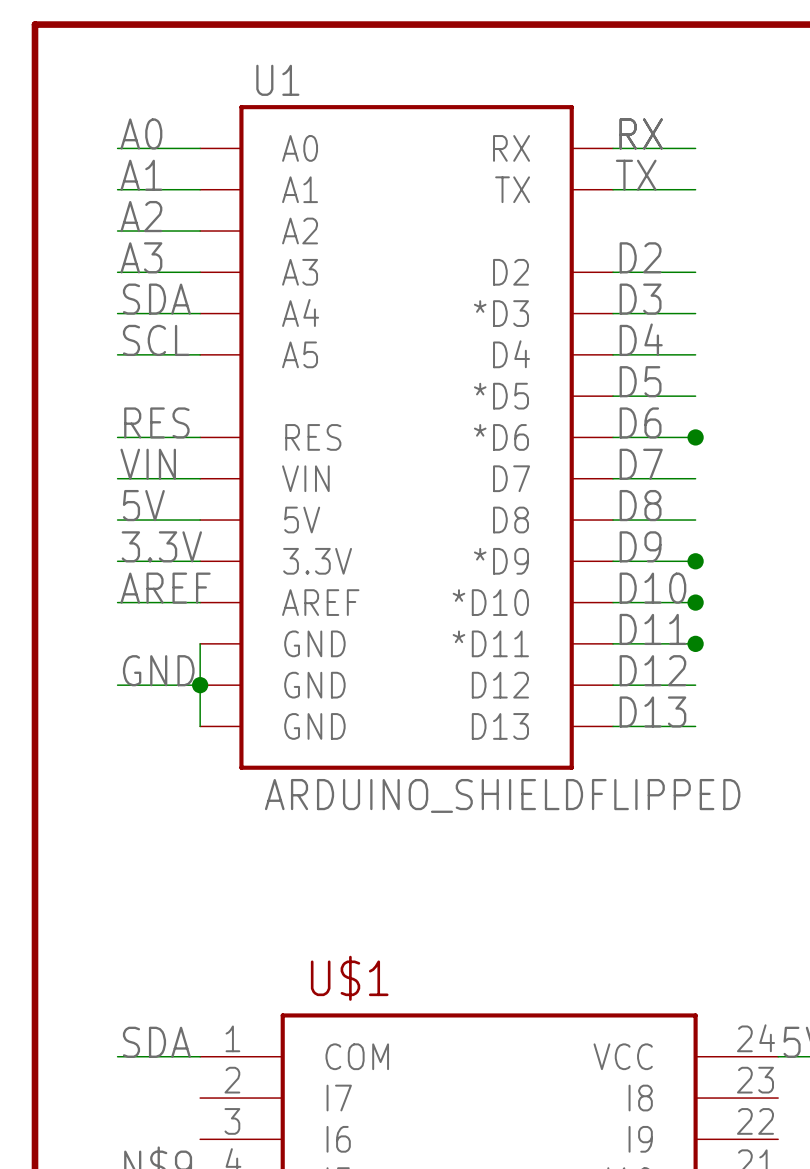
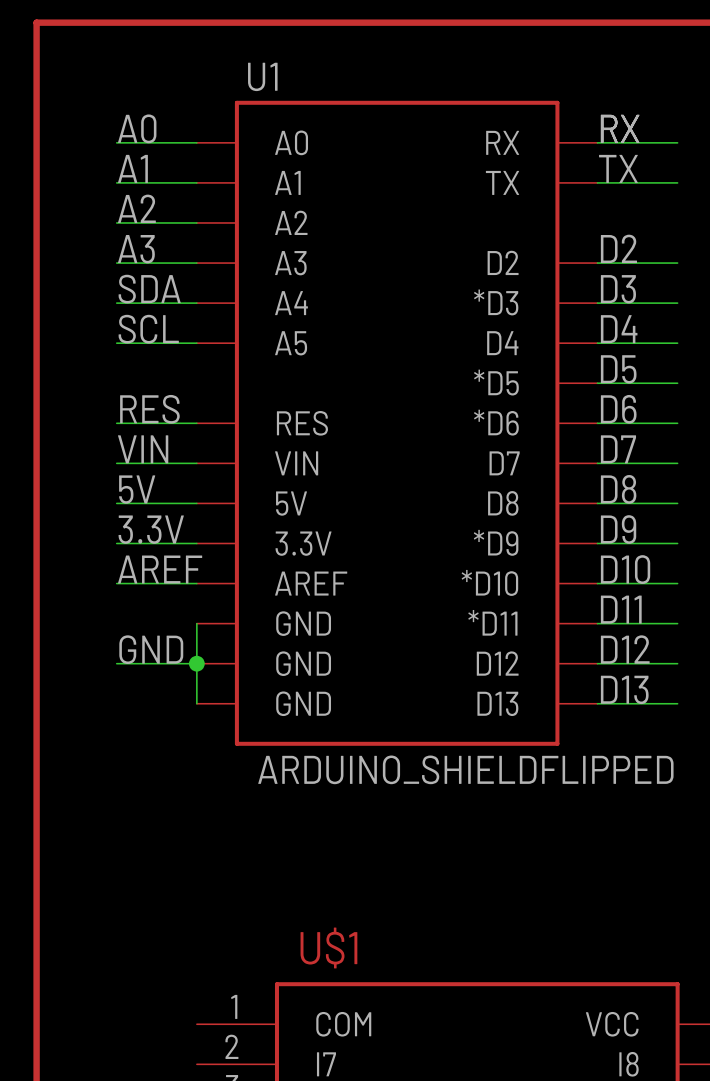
junction: (695, 437) -> none
junction: (695, 561) -> none
junction: (695, 602) -> none
junction: (695, 643) -> none
label: SDA (156, 1042) -> none
wire: (117, 1056) (200, 1056) -> none

